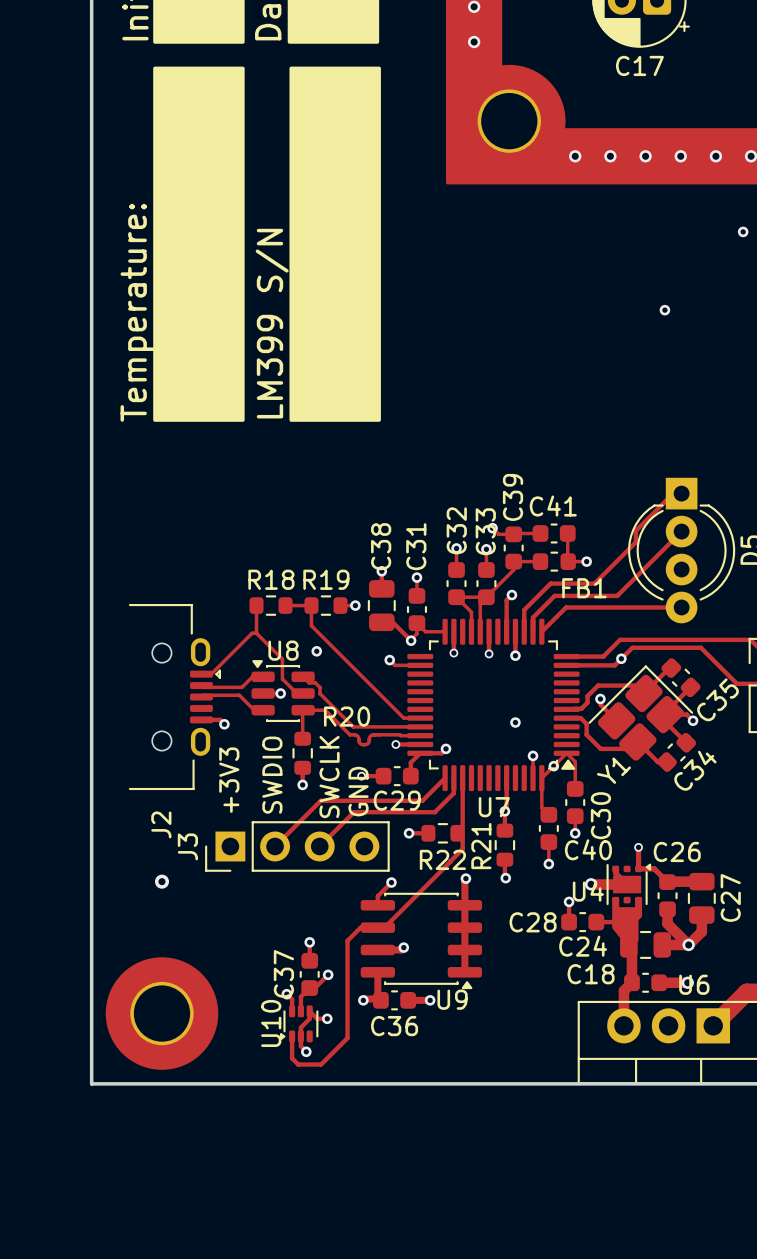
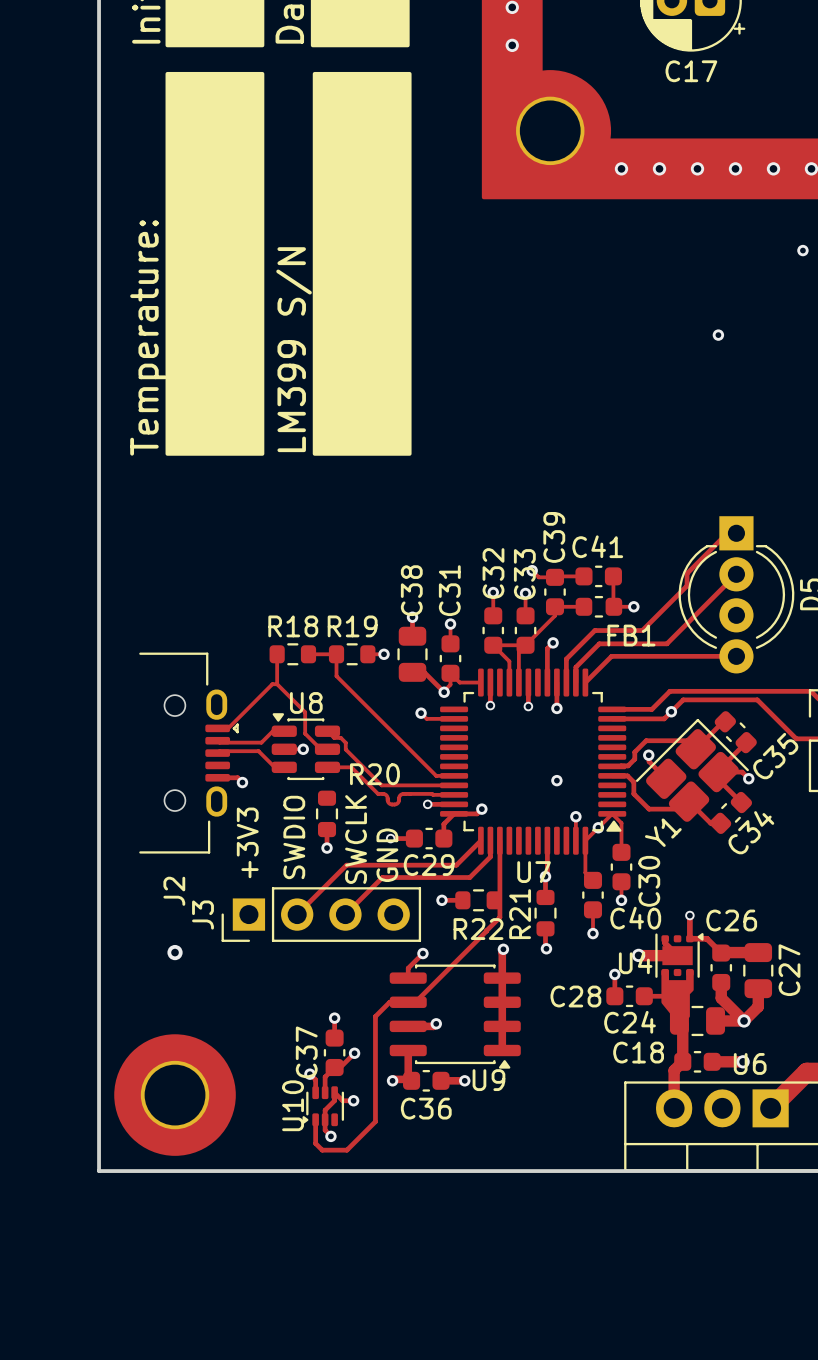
via: (316, 651) -> none
track: (302, 710) (302, 738) -> none

